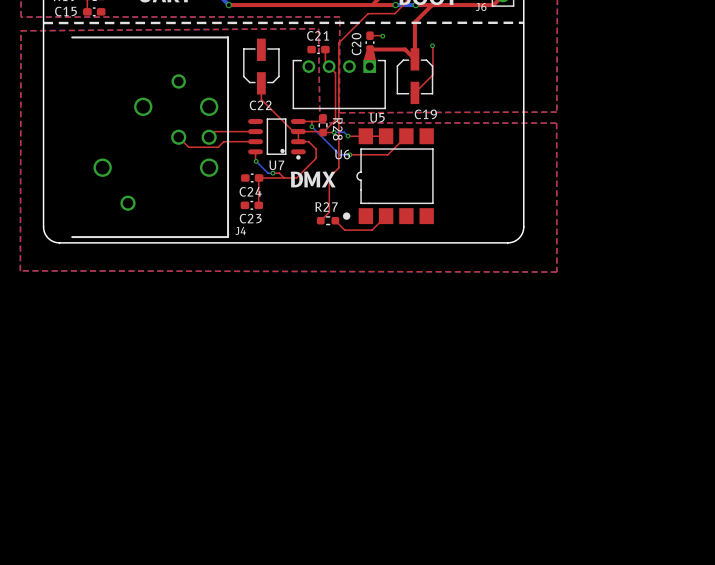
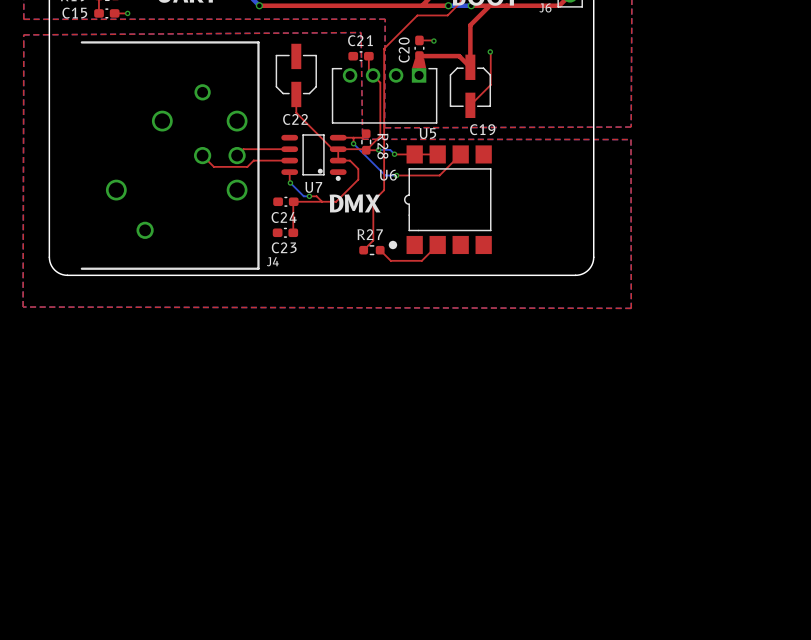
top track: none -> (114, 13) (127, 13)
via: none -> (127, 13)
line: (523, 22) (43, 23) -> none

